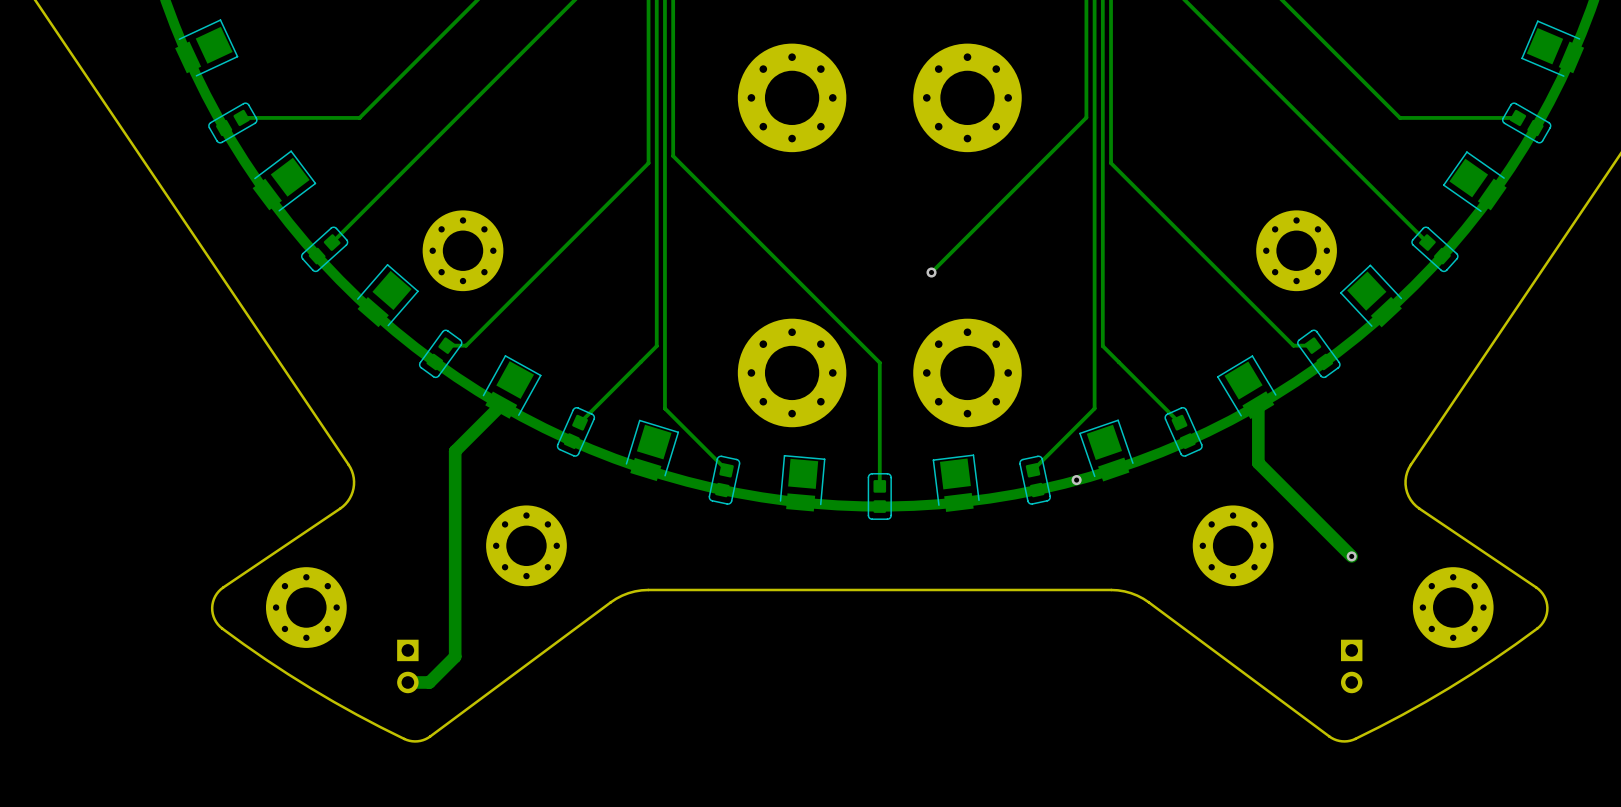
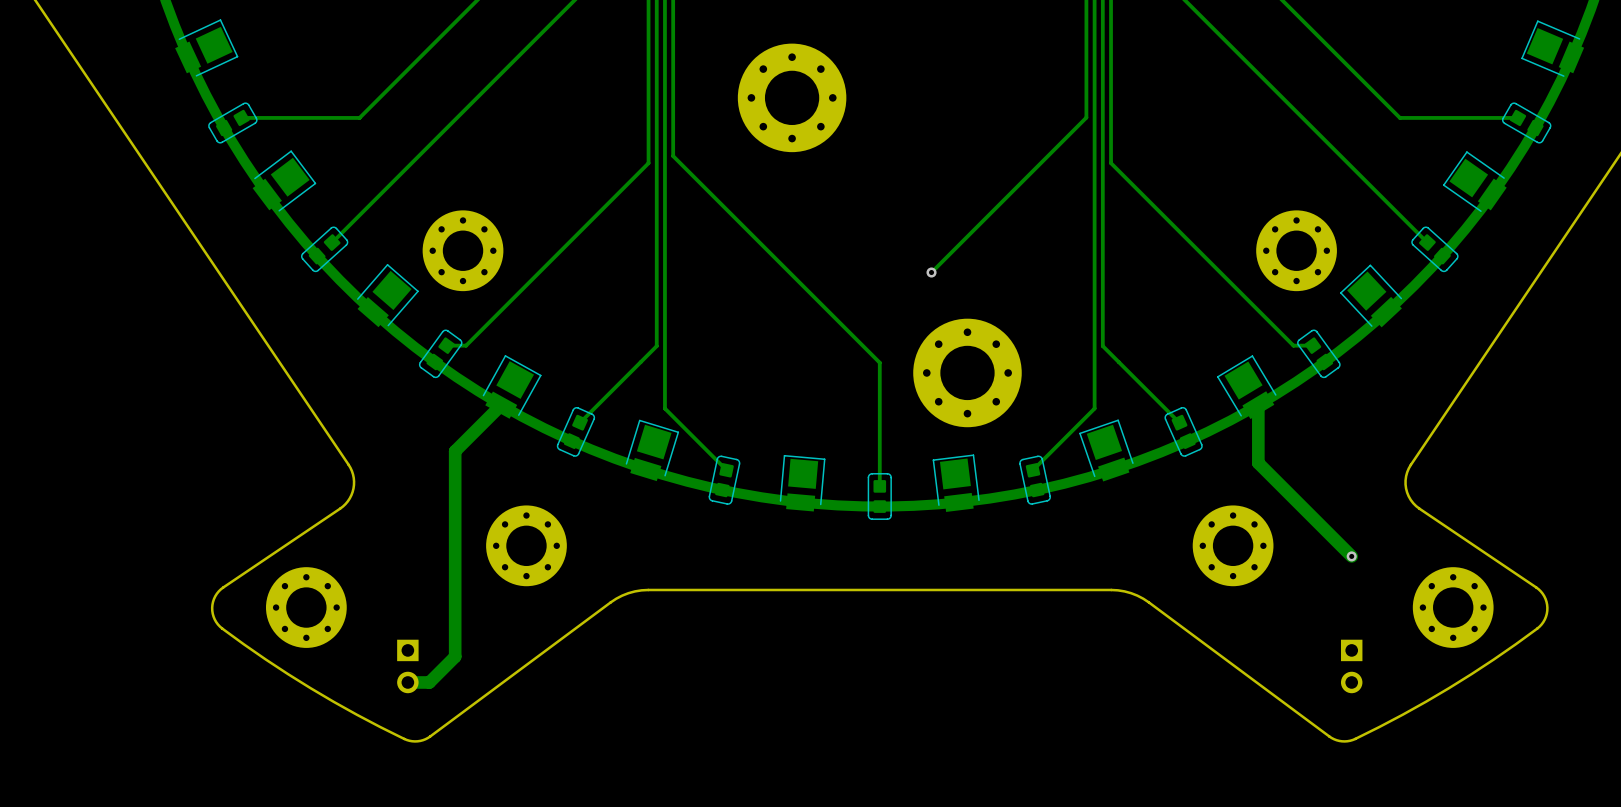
part: (967, 97) -> none
part: (792, 372) -> none
via: (1076, 480) -> none

